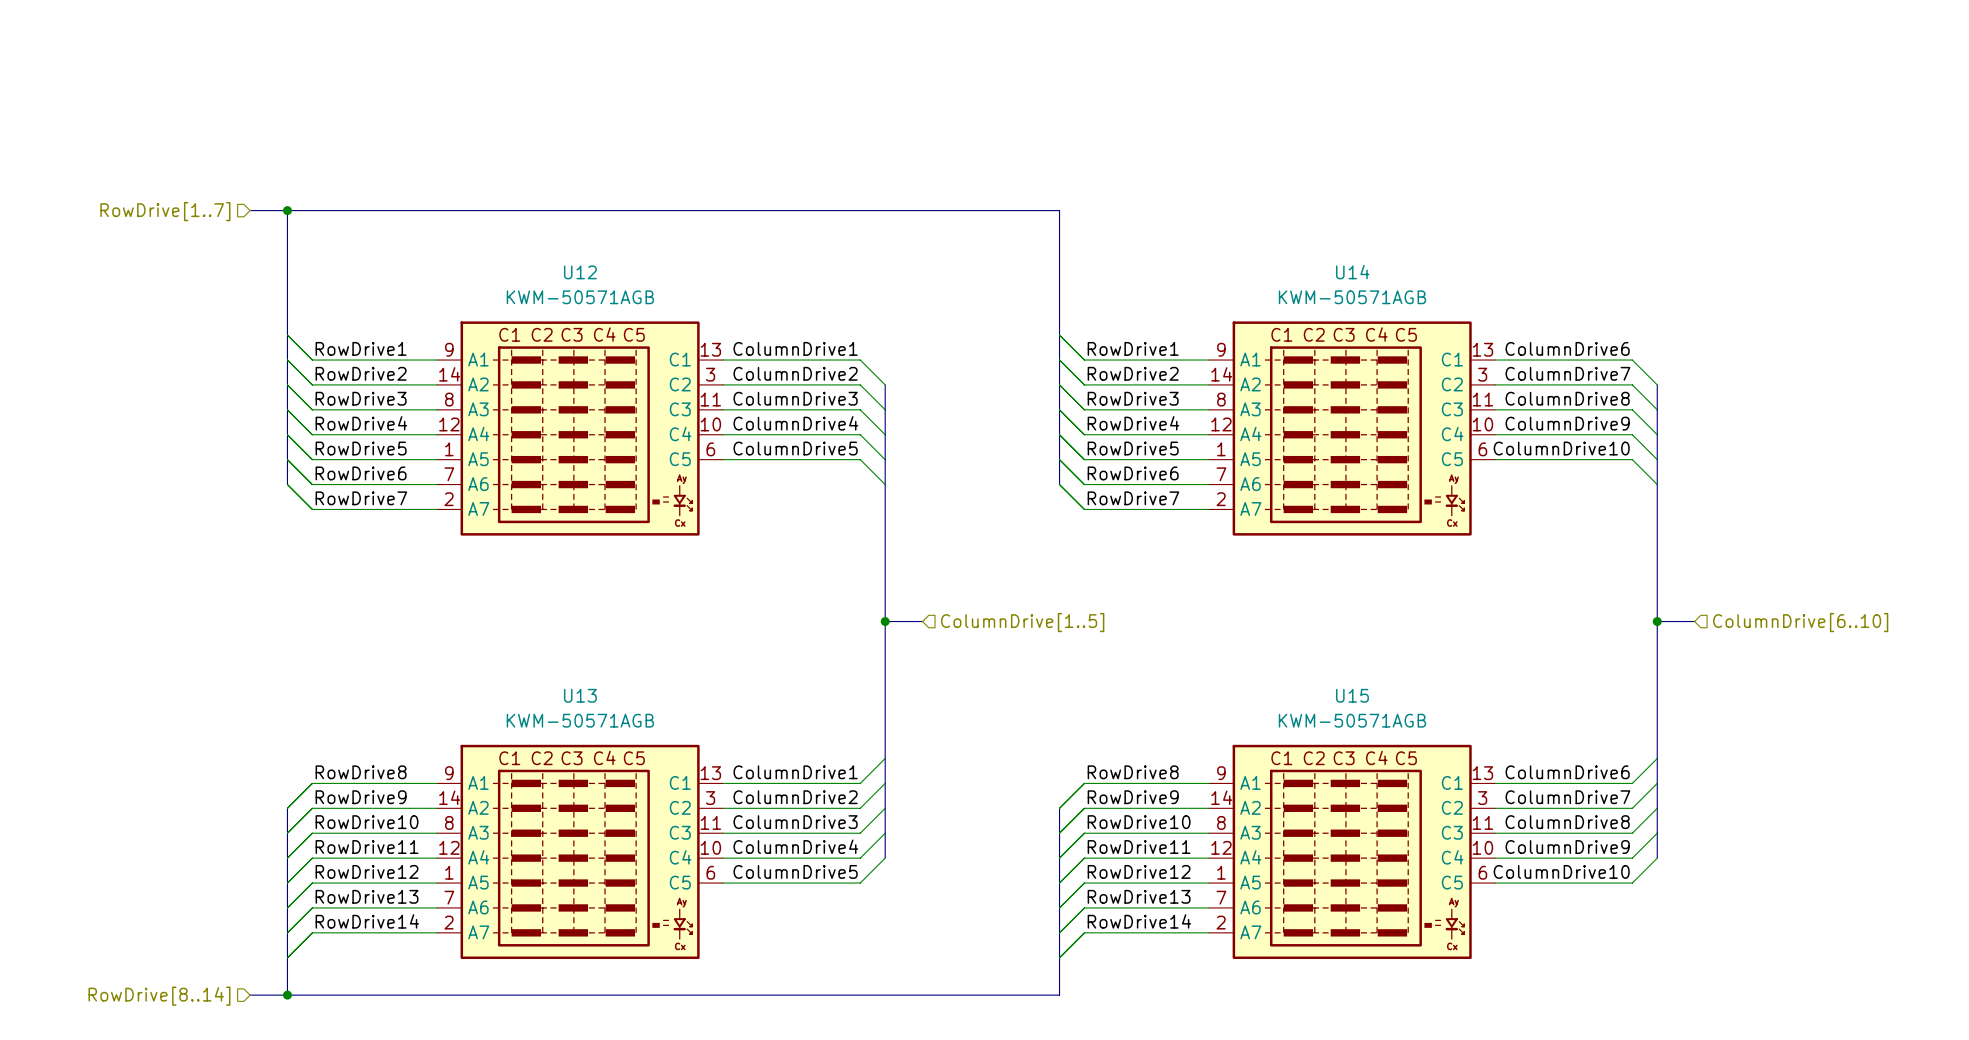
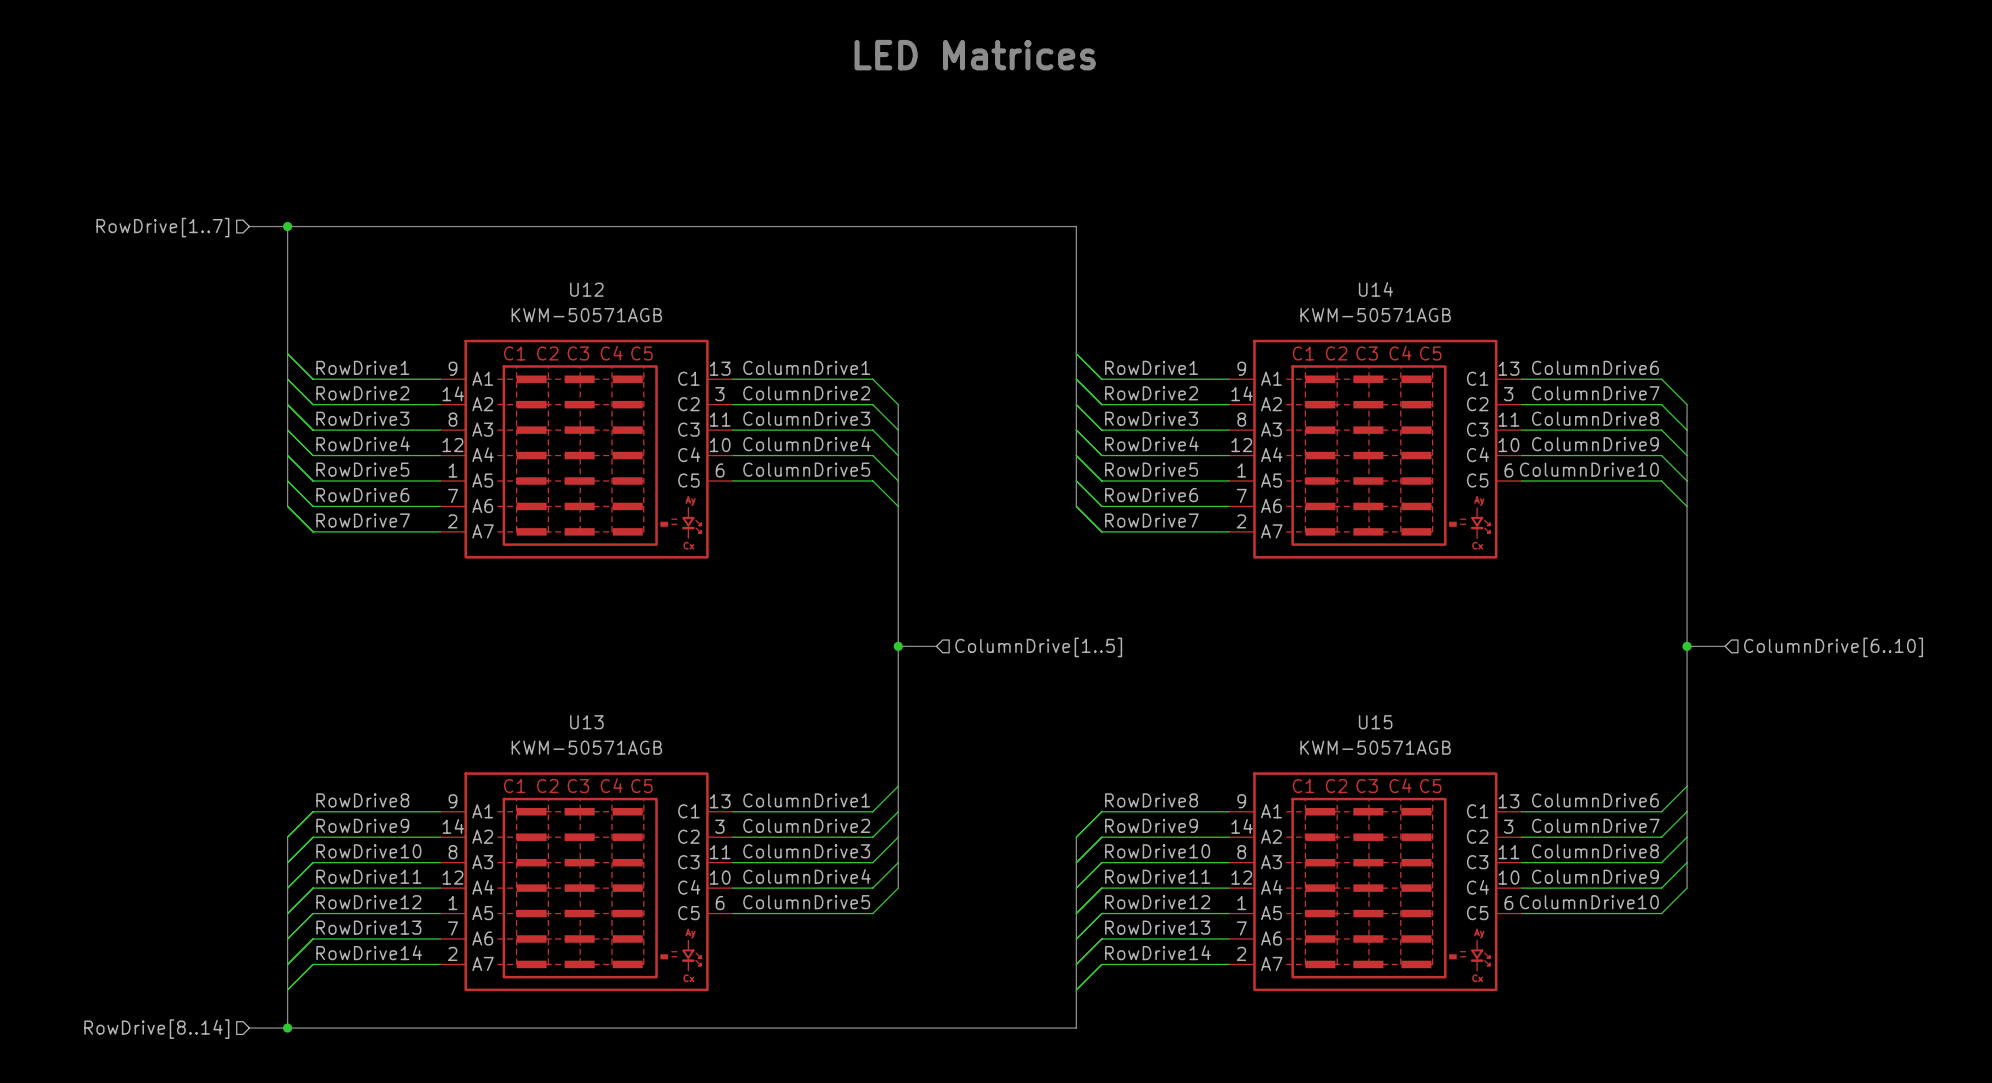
text: none -> LED Matrices (975, 55)

